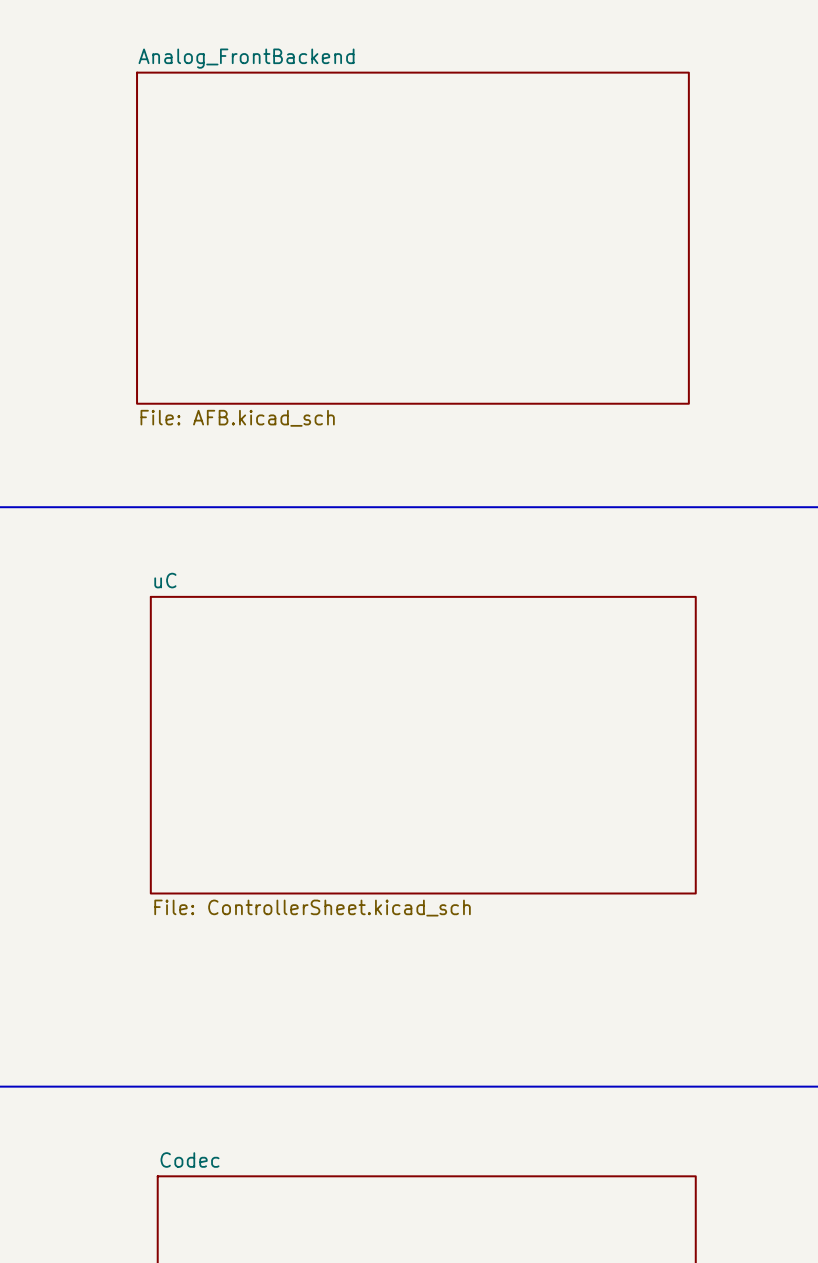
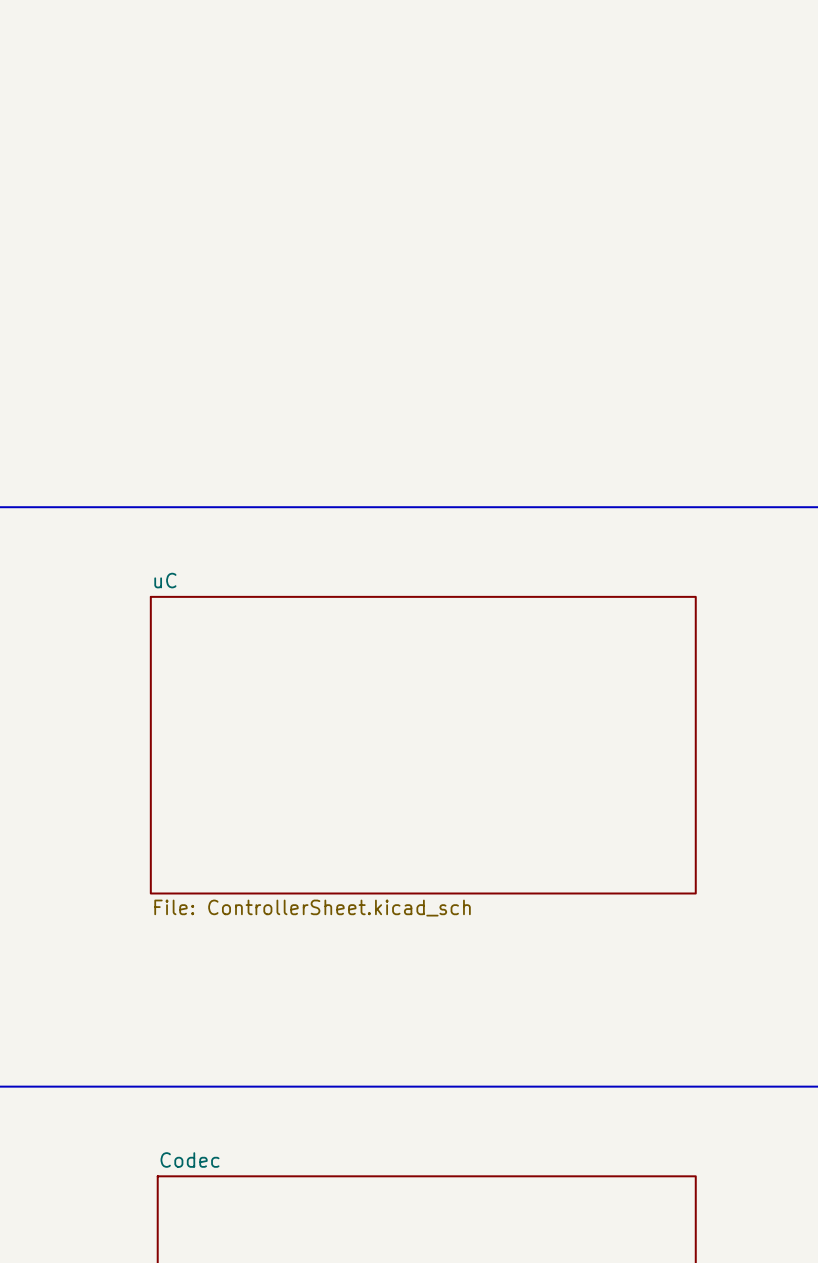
sheet Analog_FrontBackend: File: AFB.kicad_sch (412, 238) -> none

